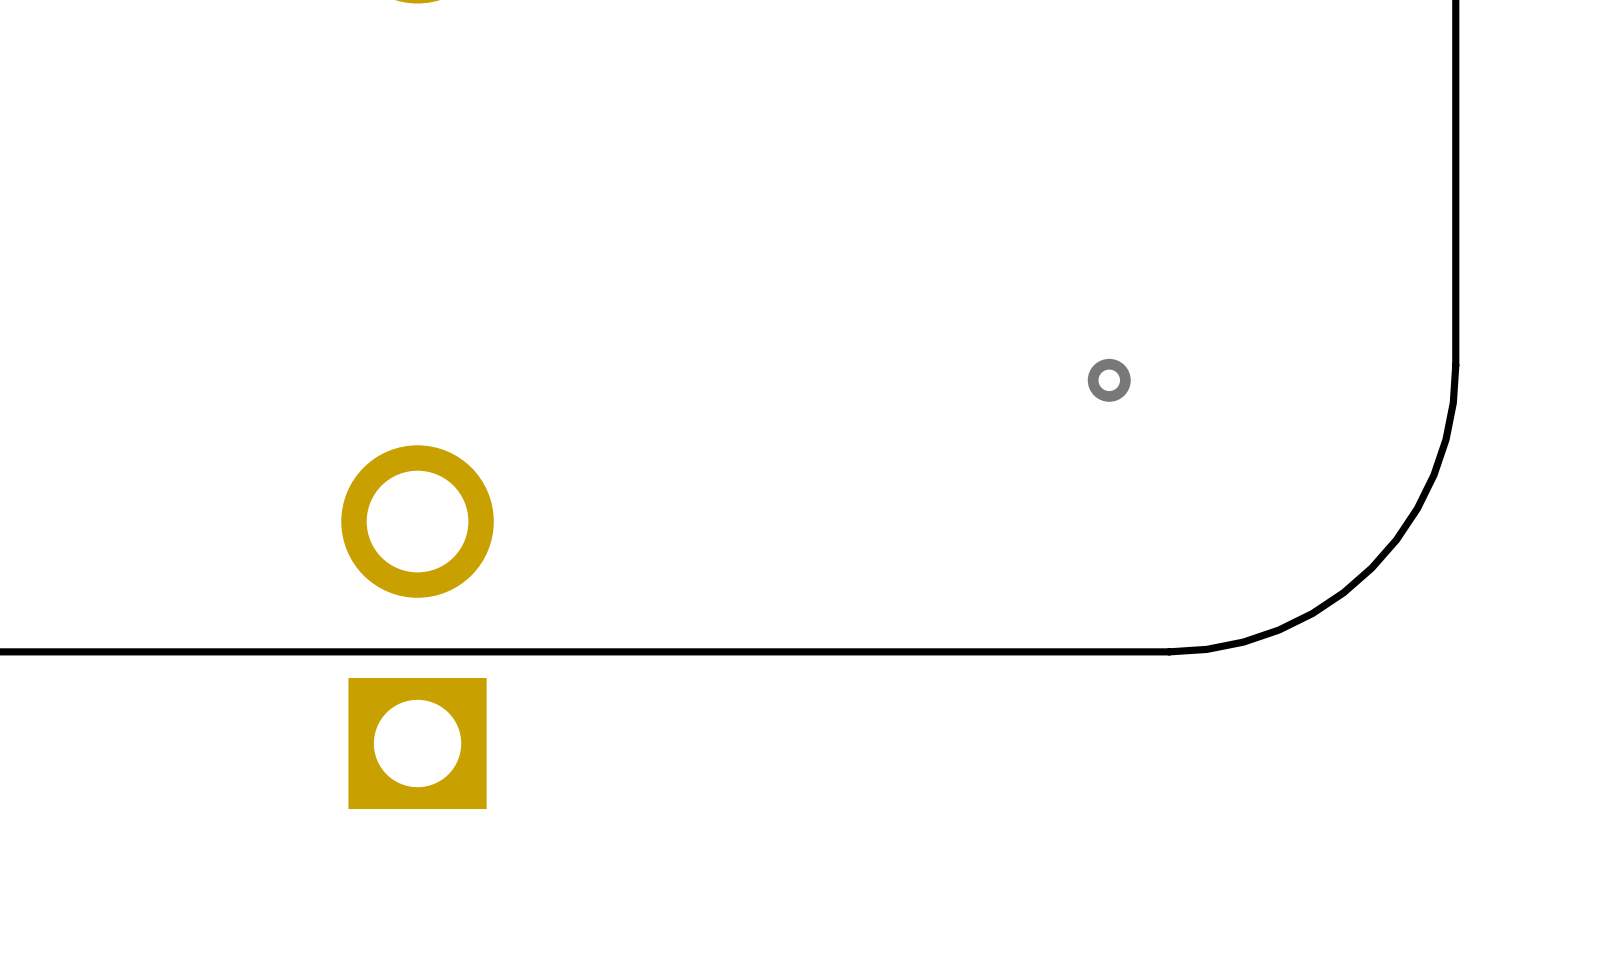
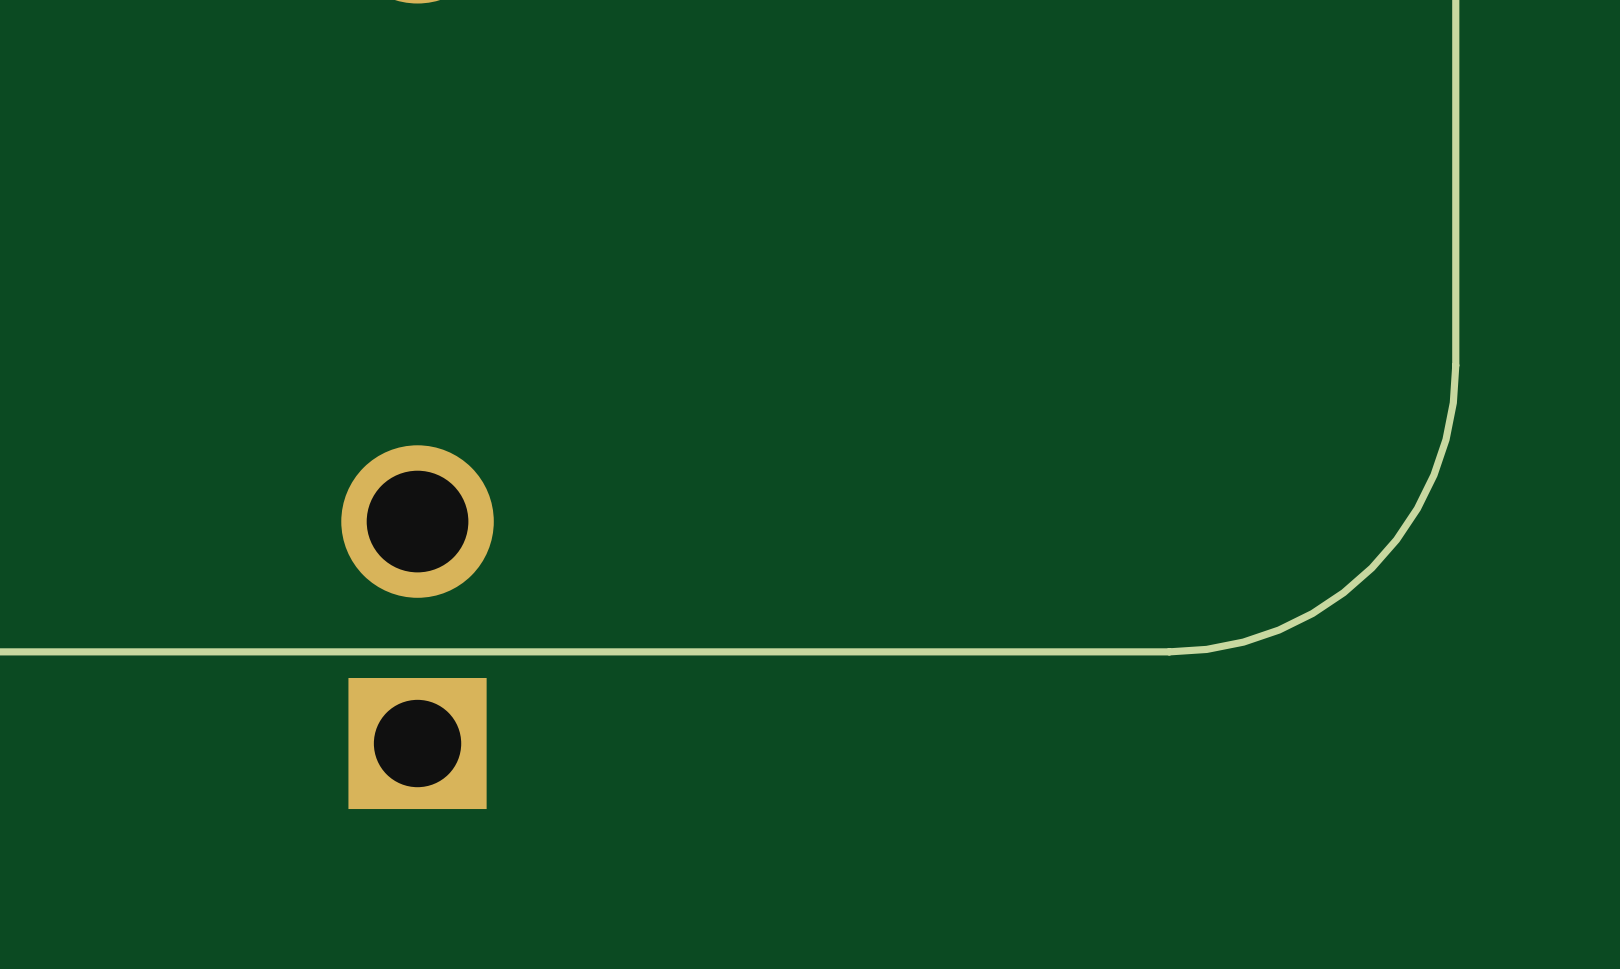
via: (1109, 380) -> none

